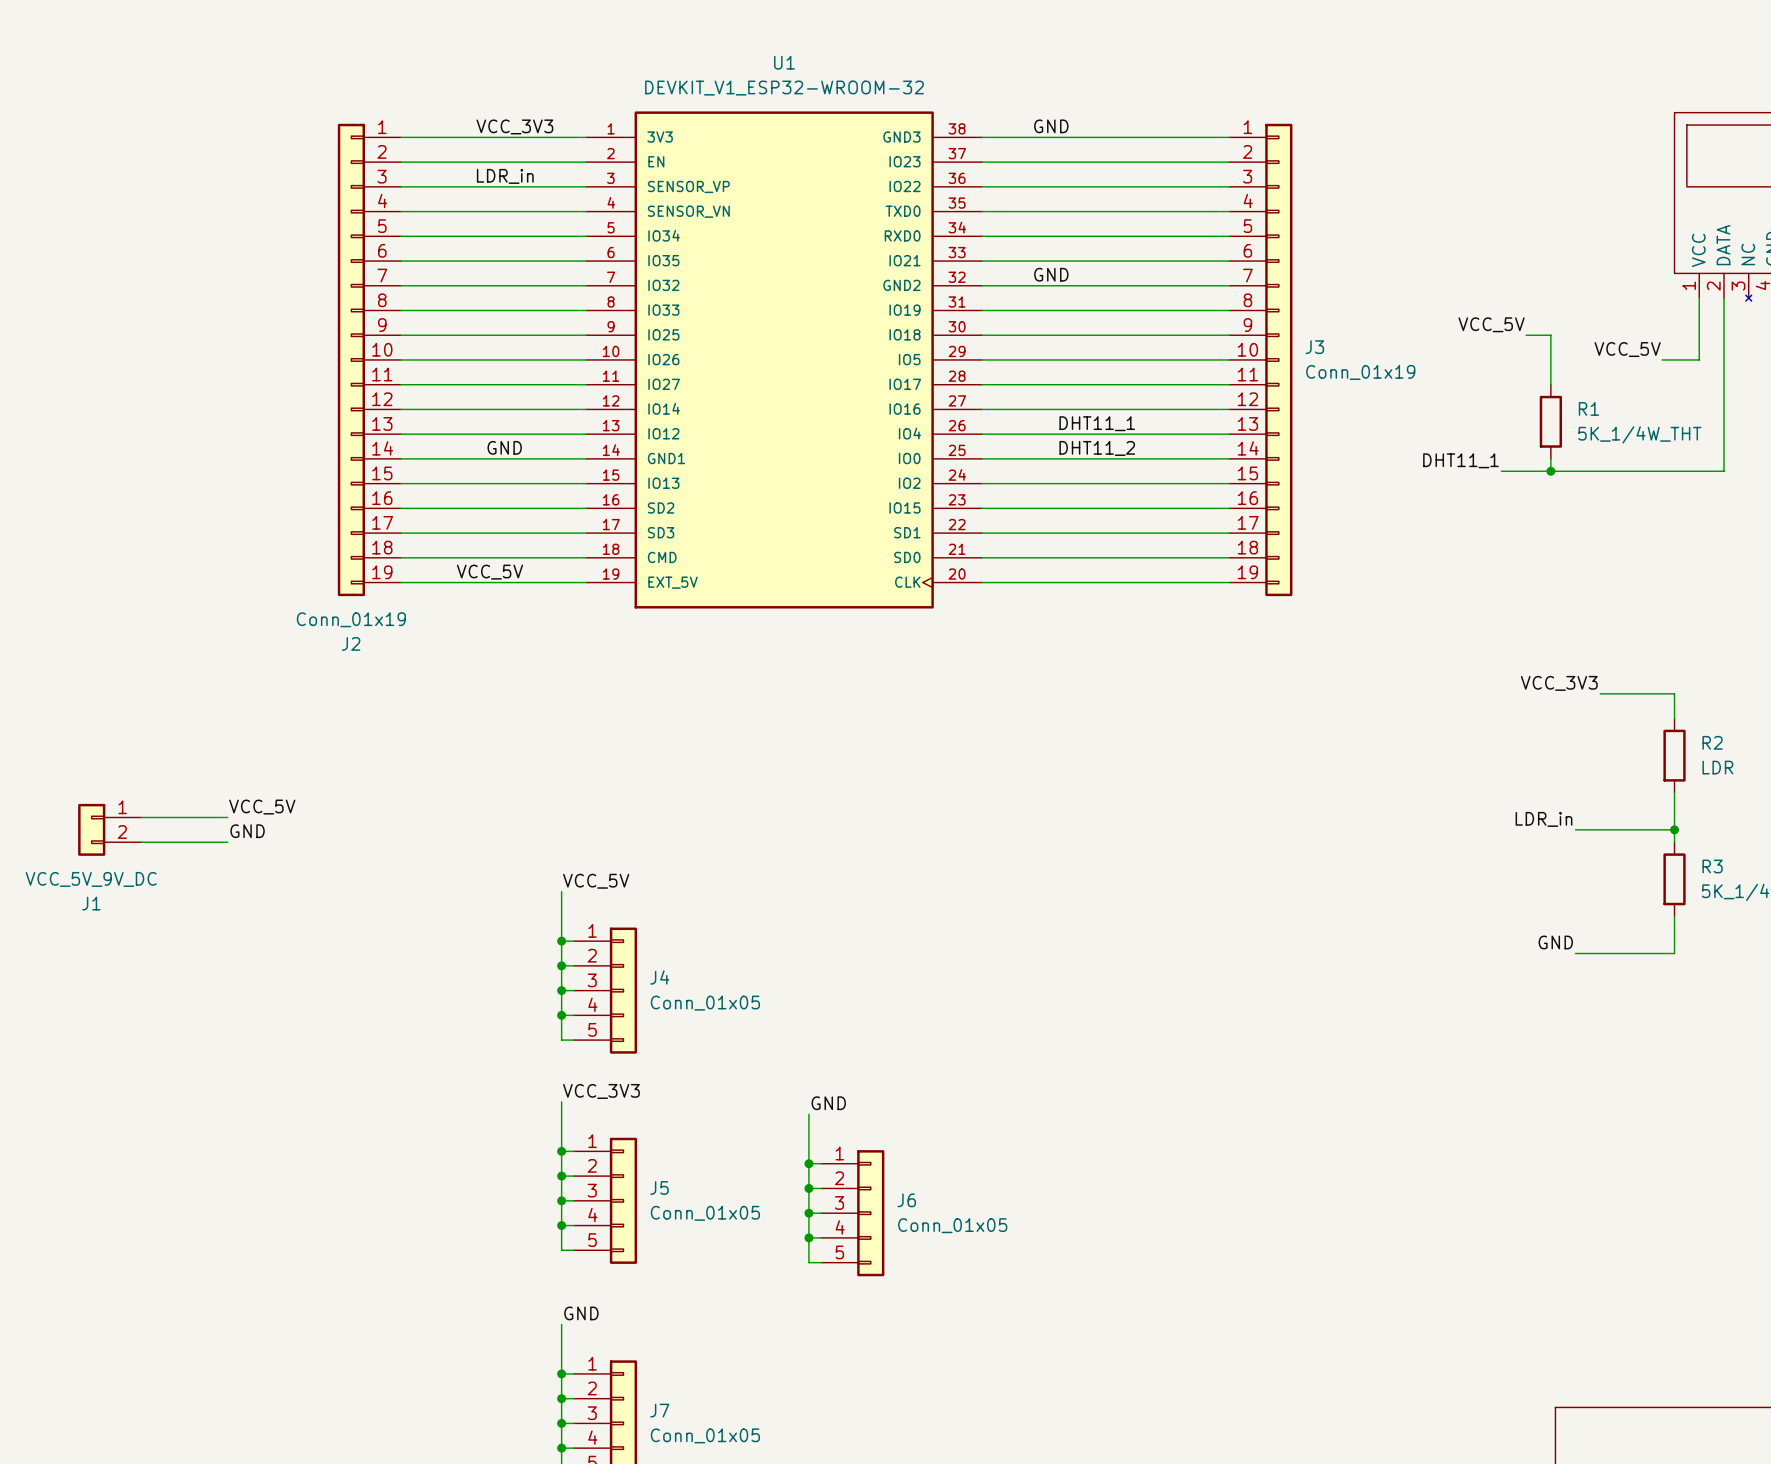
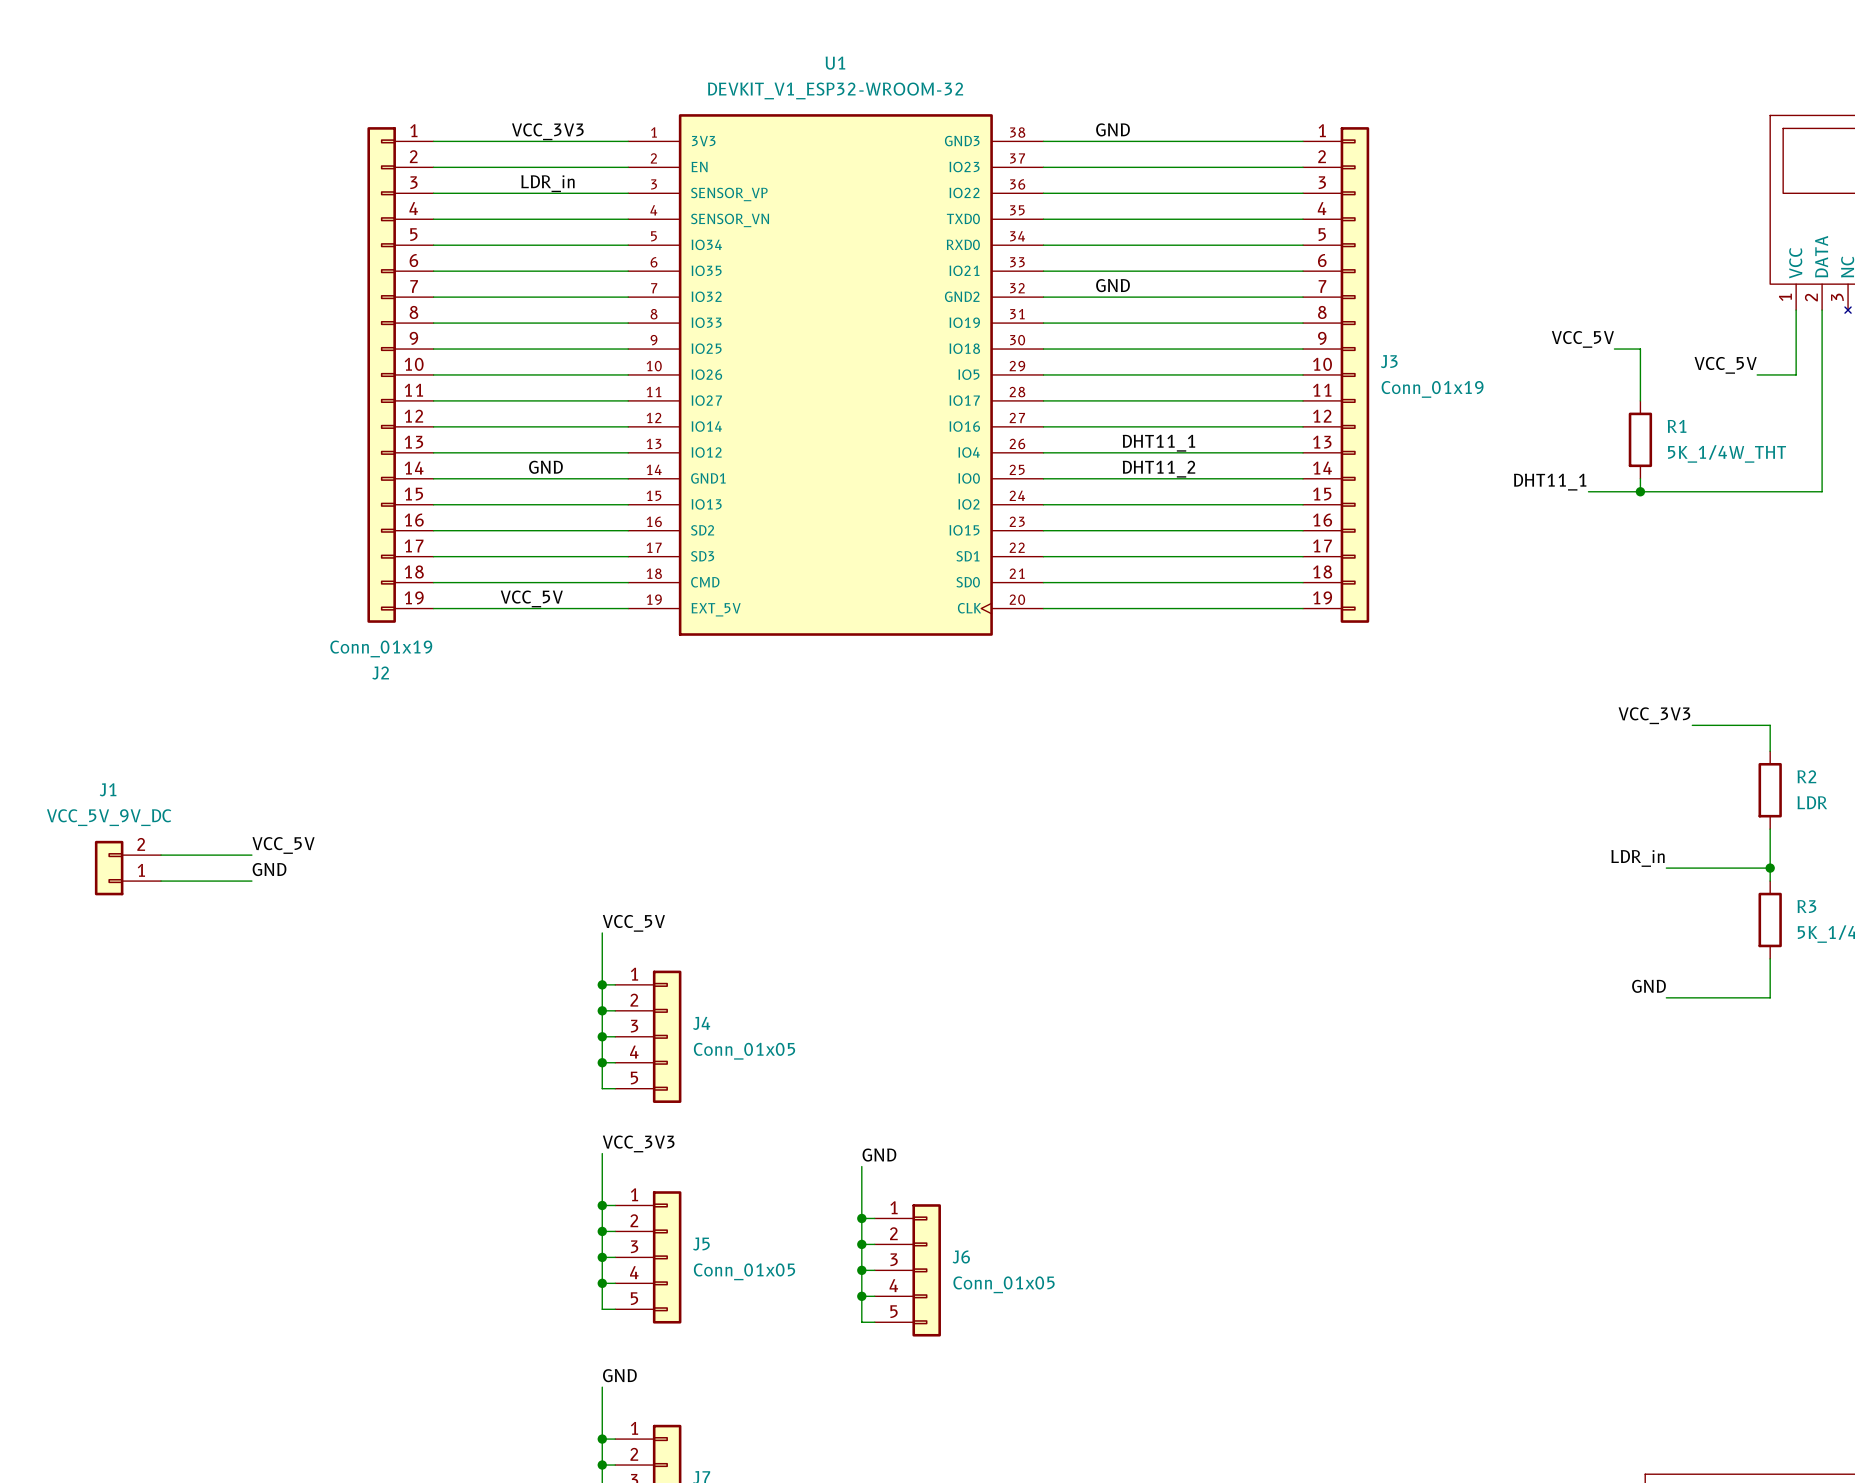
J1 flip: as is (91, 829) -> up-down (109, 868)

